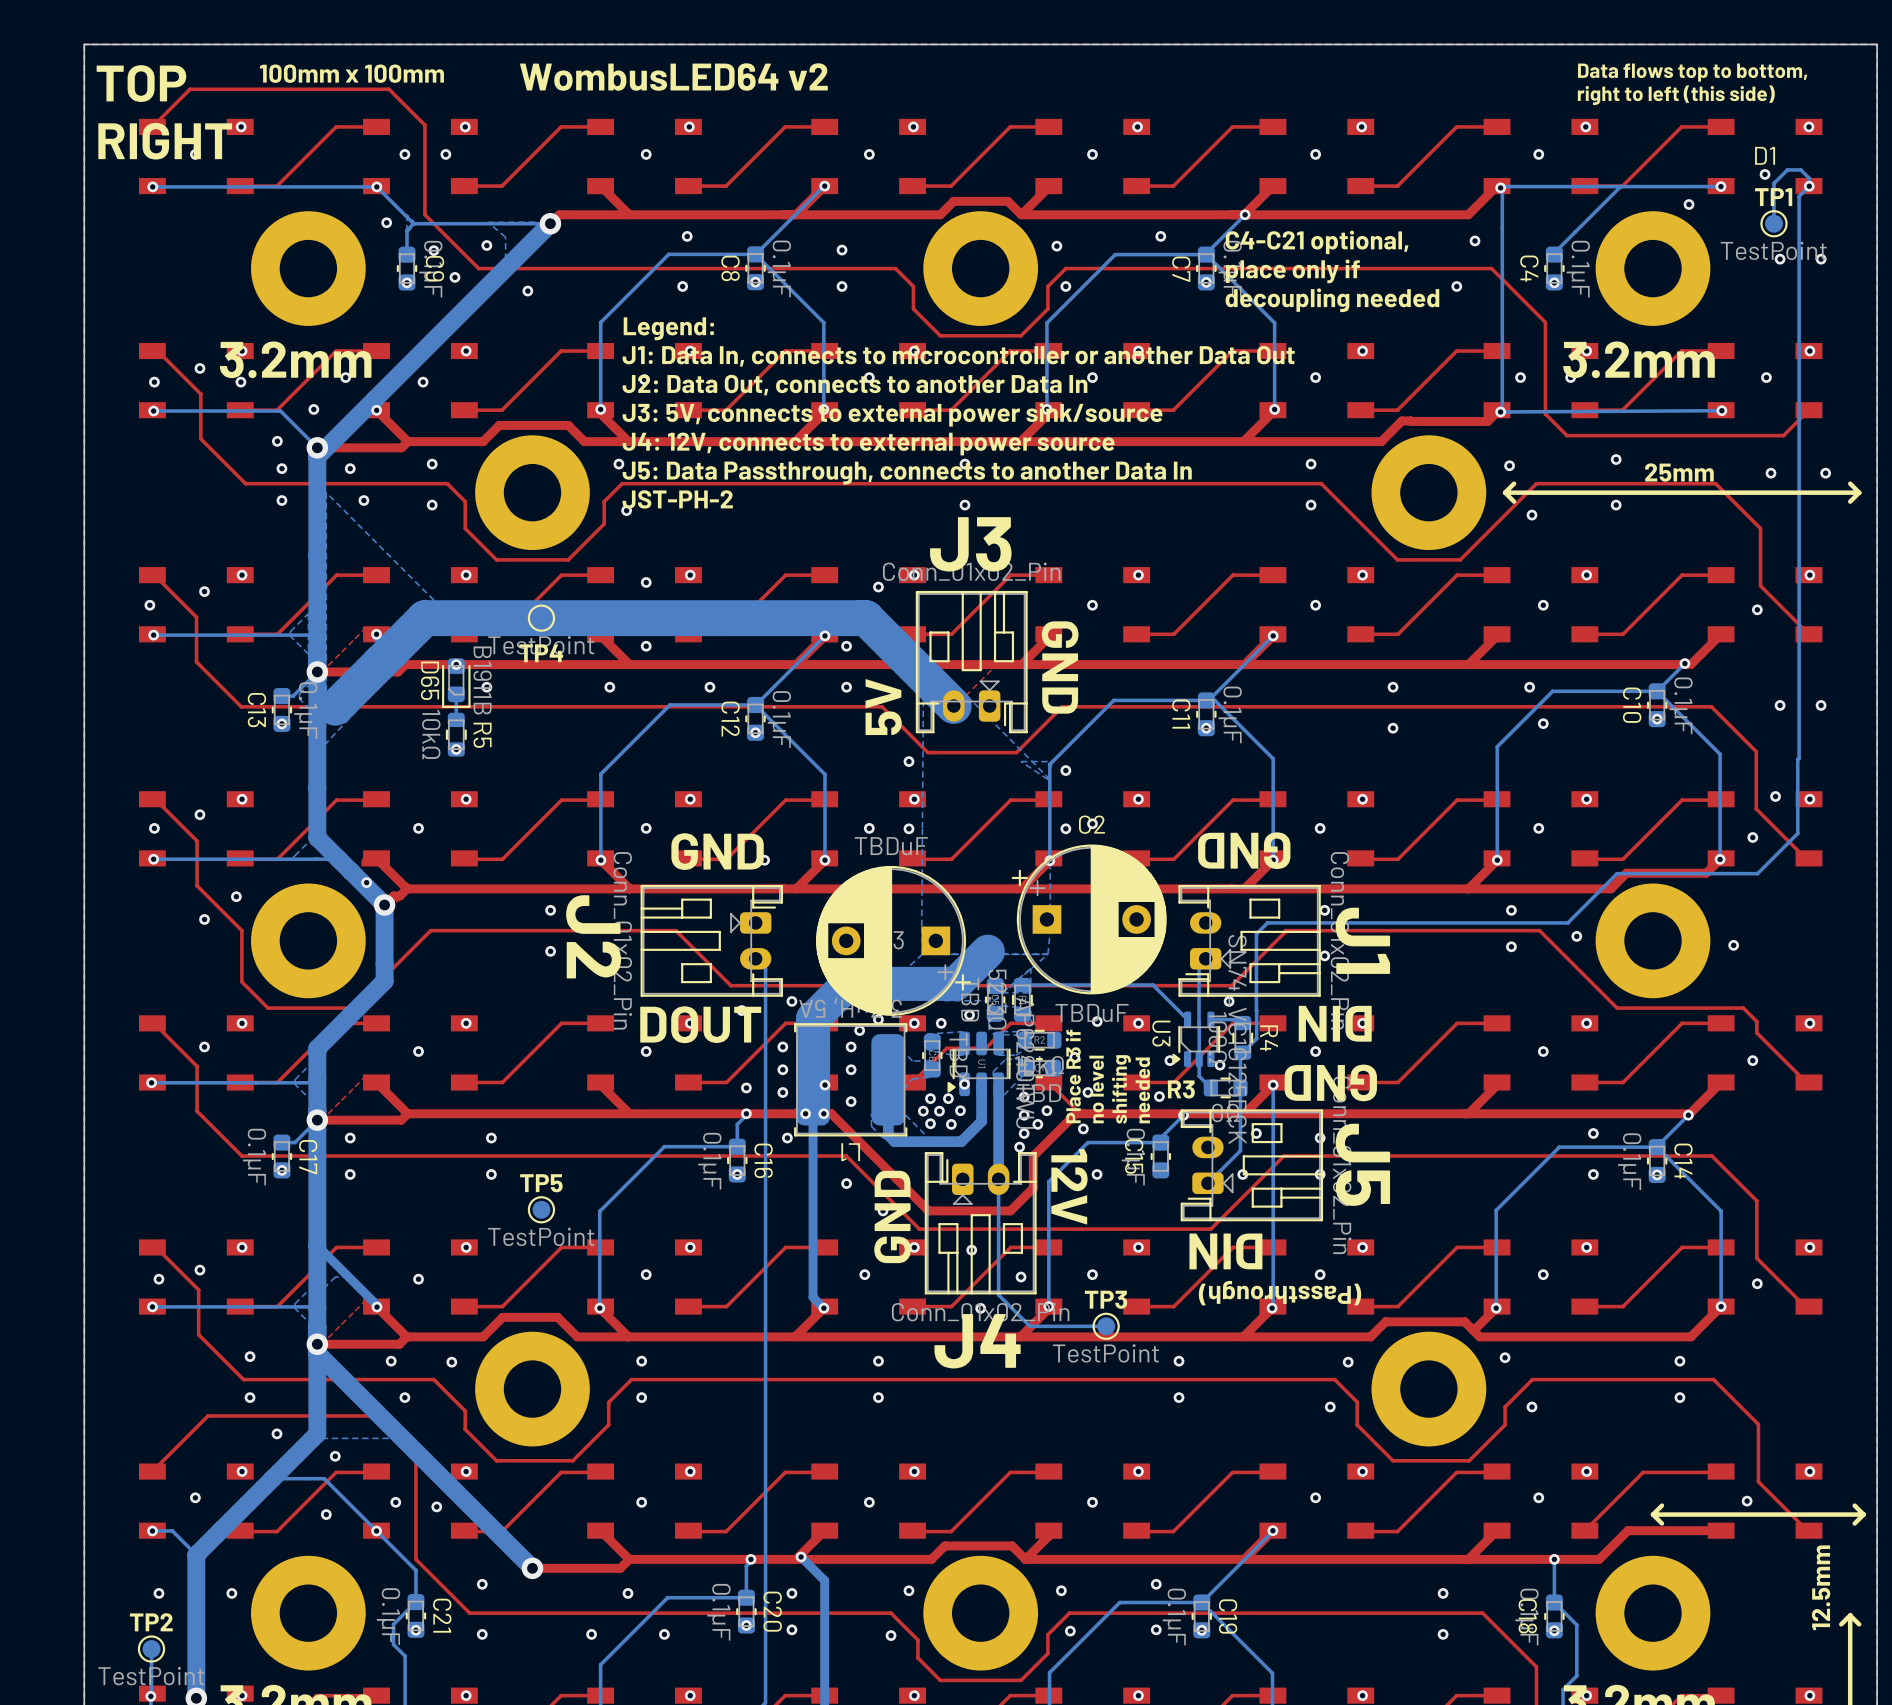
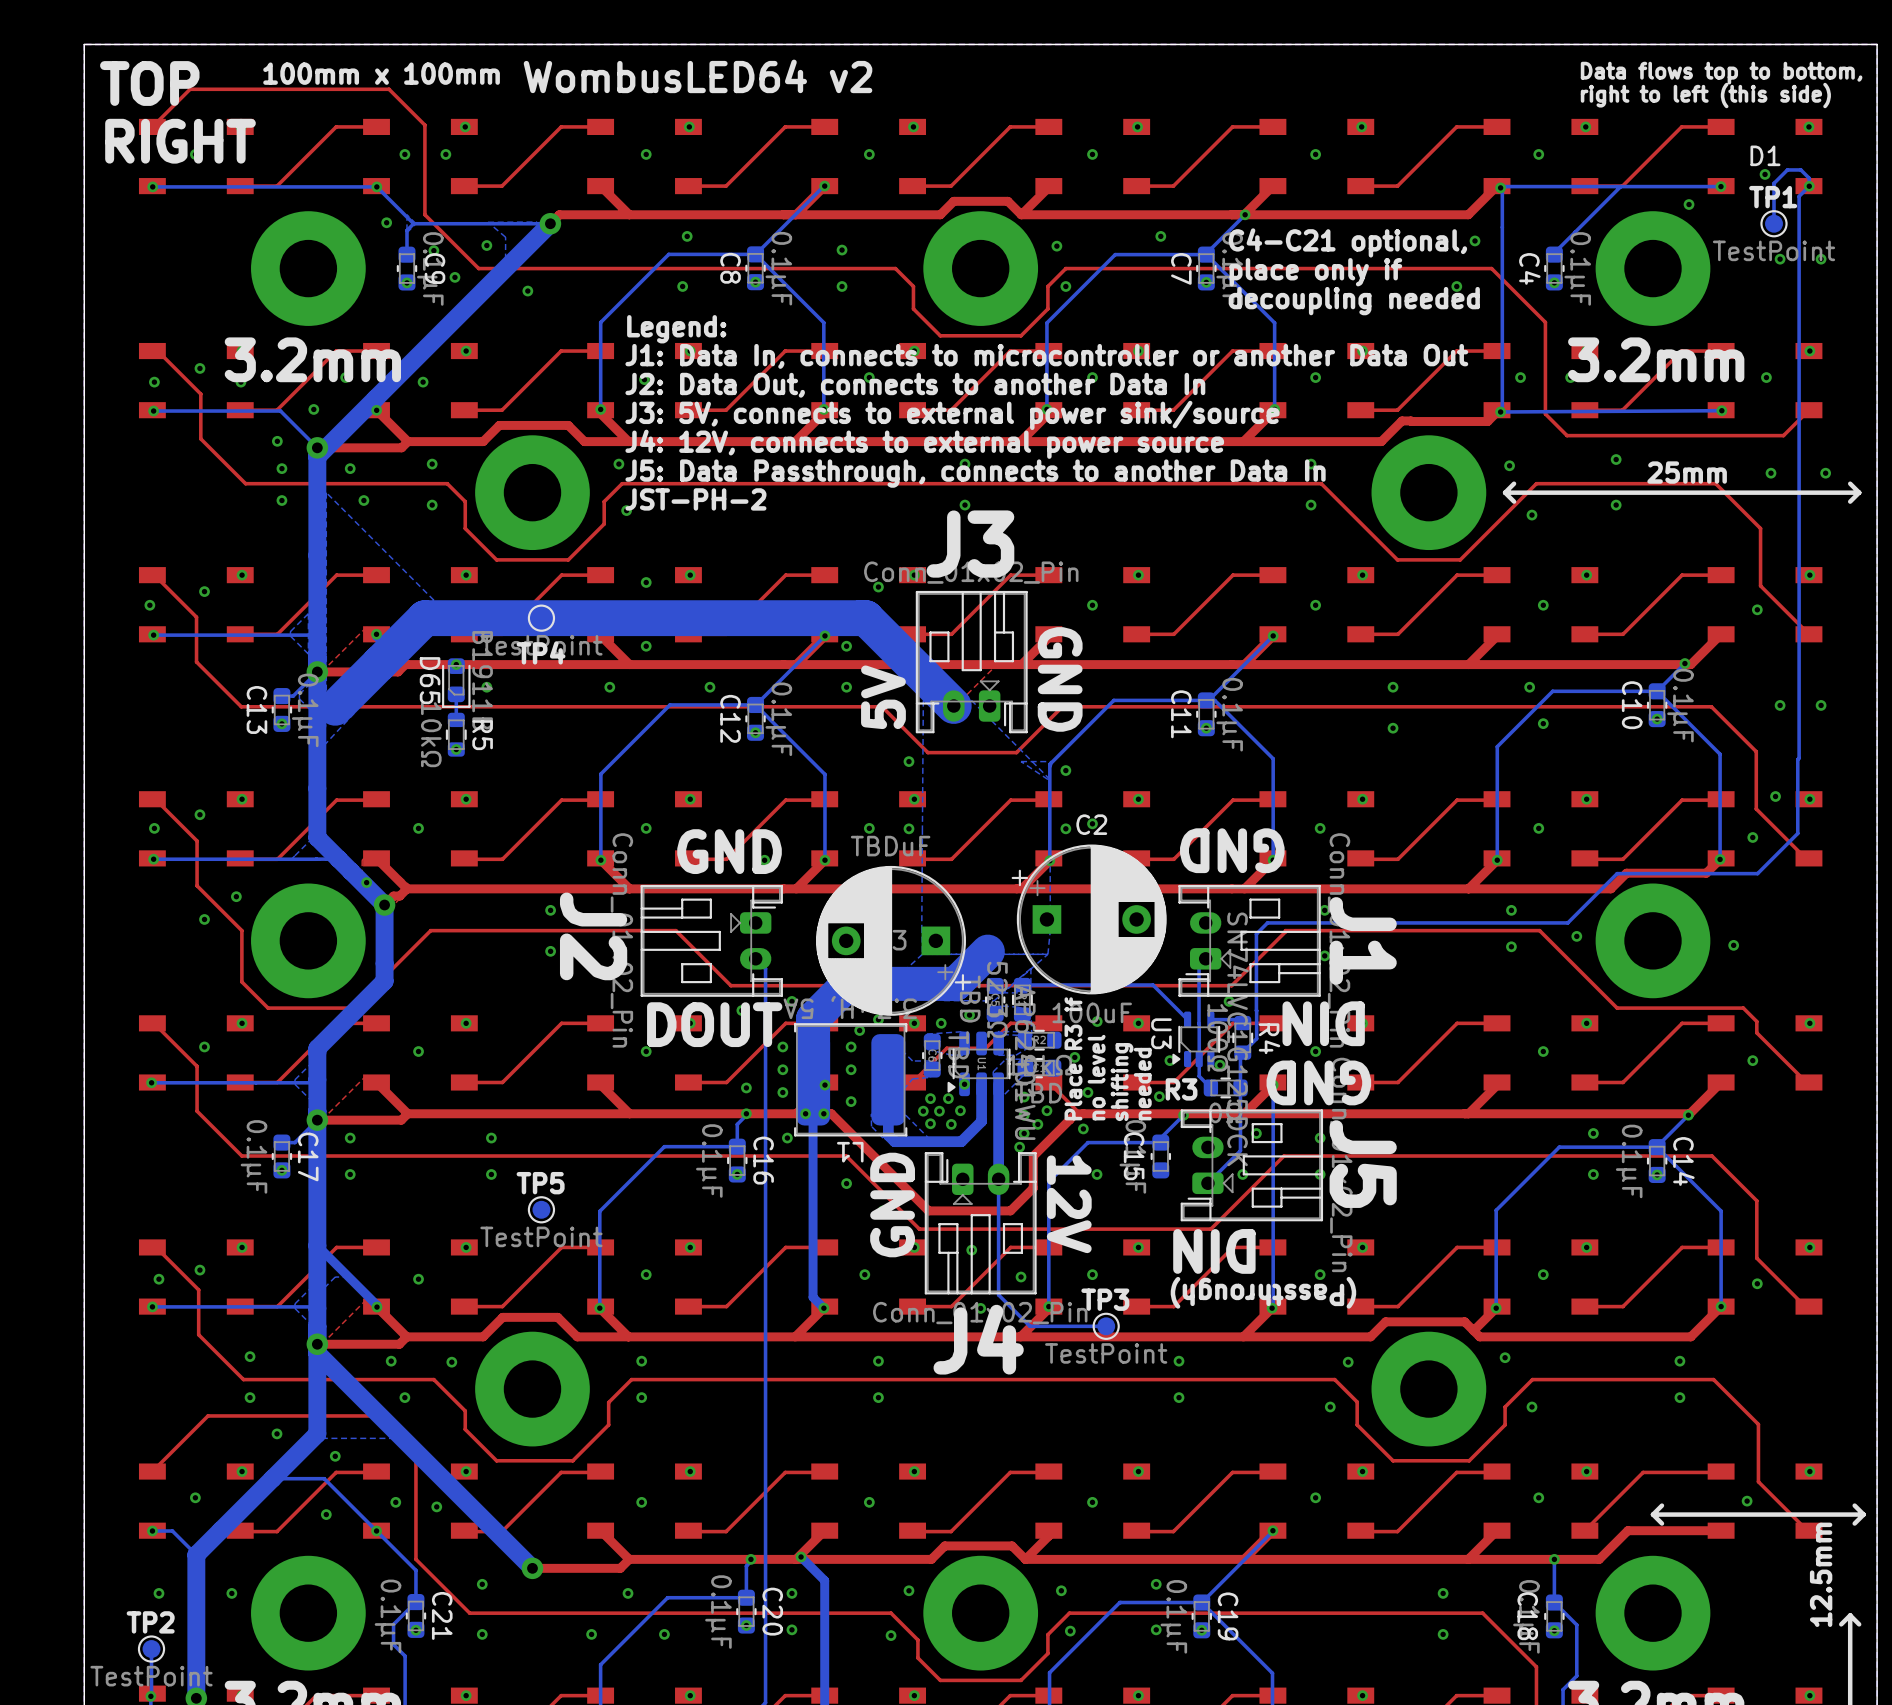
C2 value: TBDuF (1092, 1013) -> 100uF (1092, 1012)

